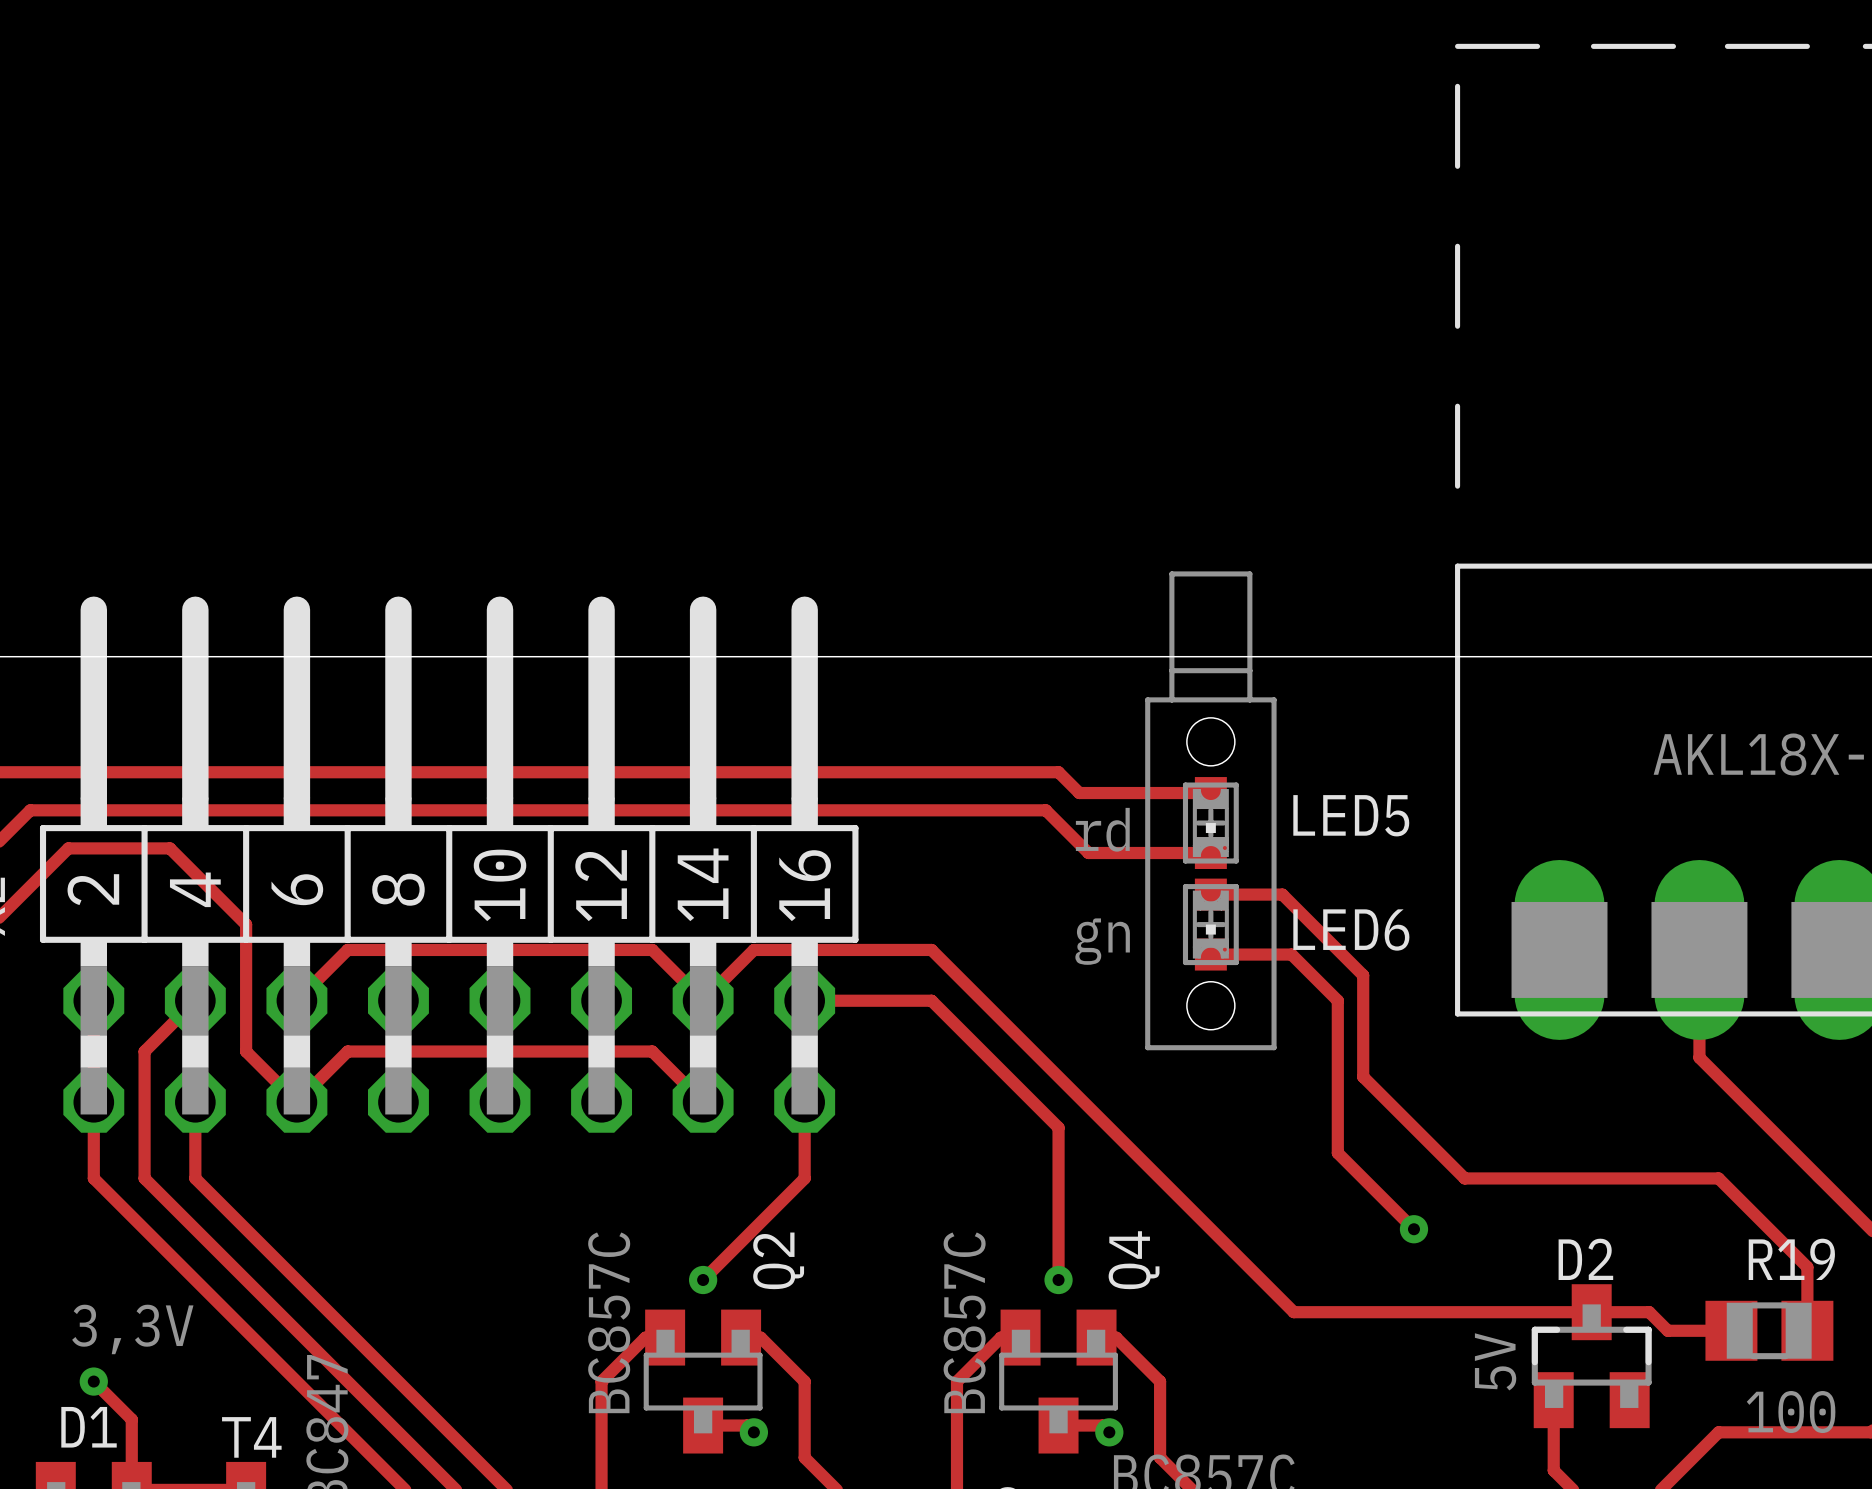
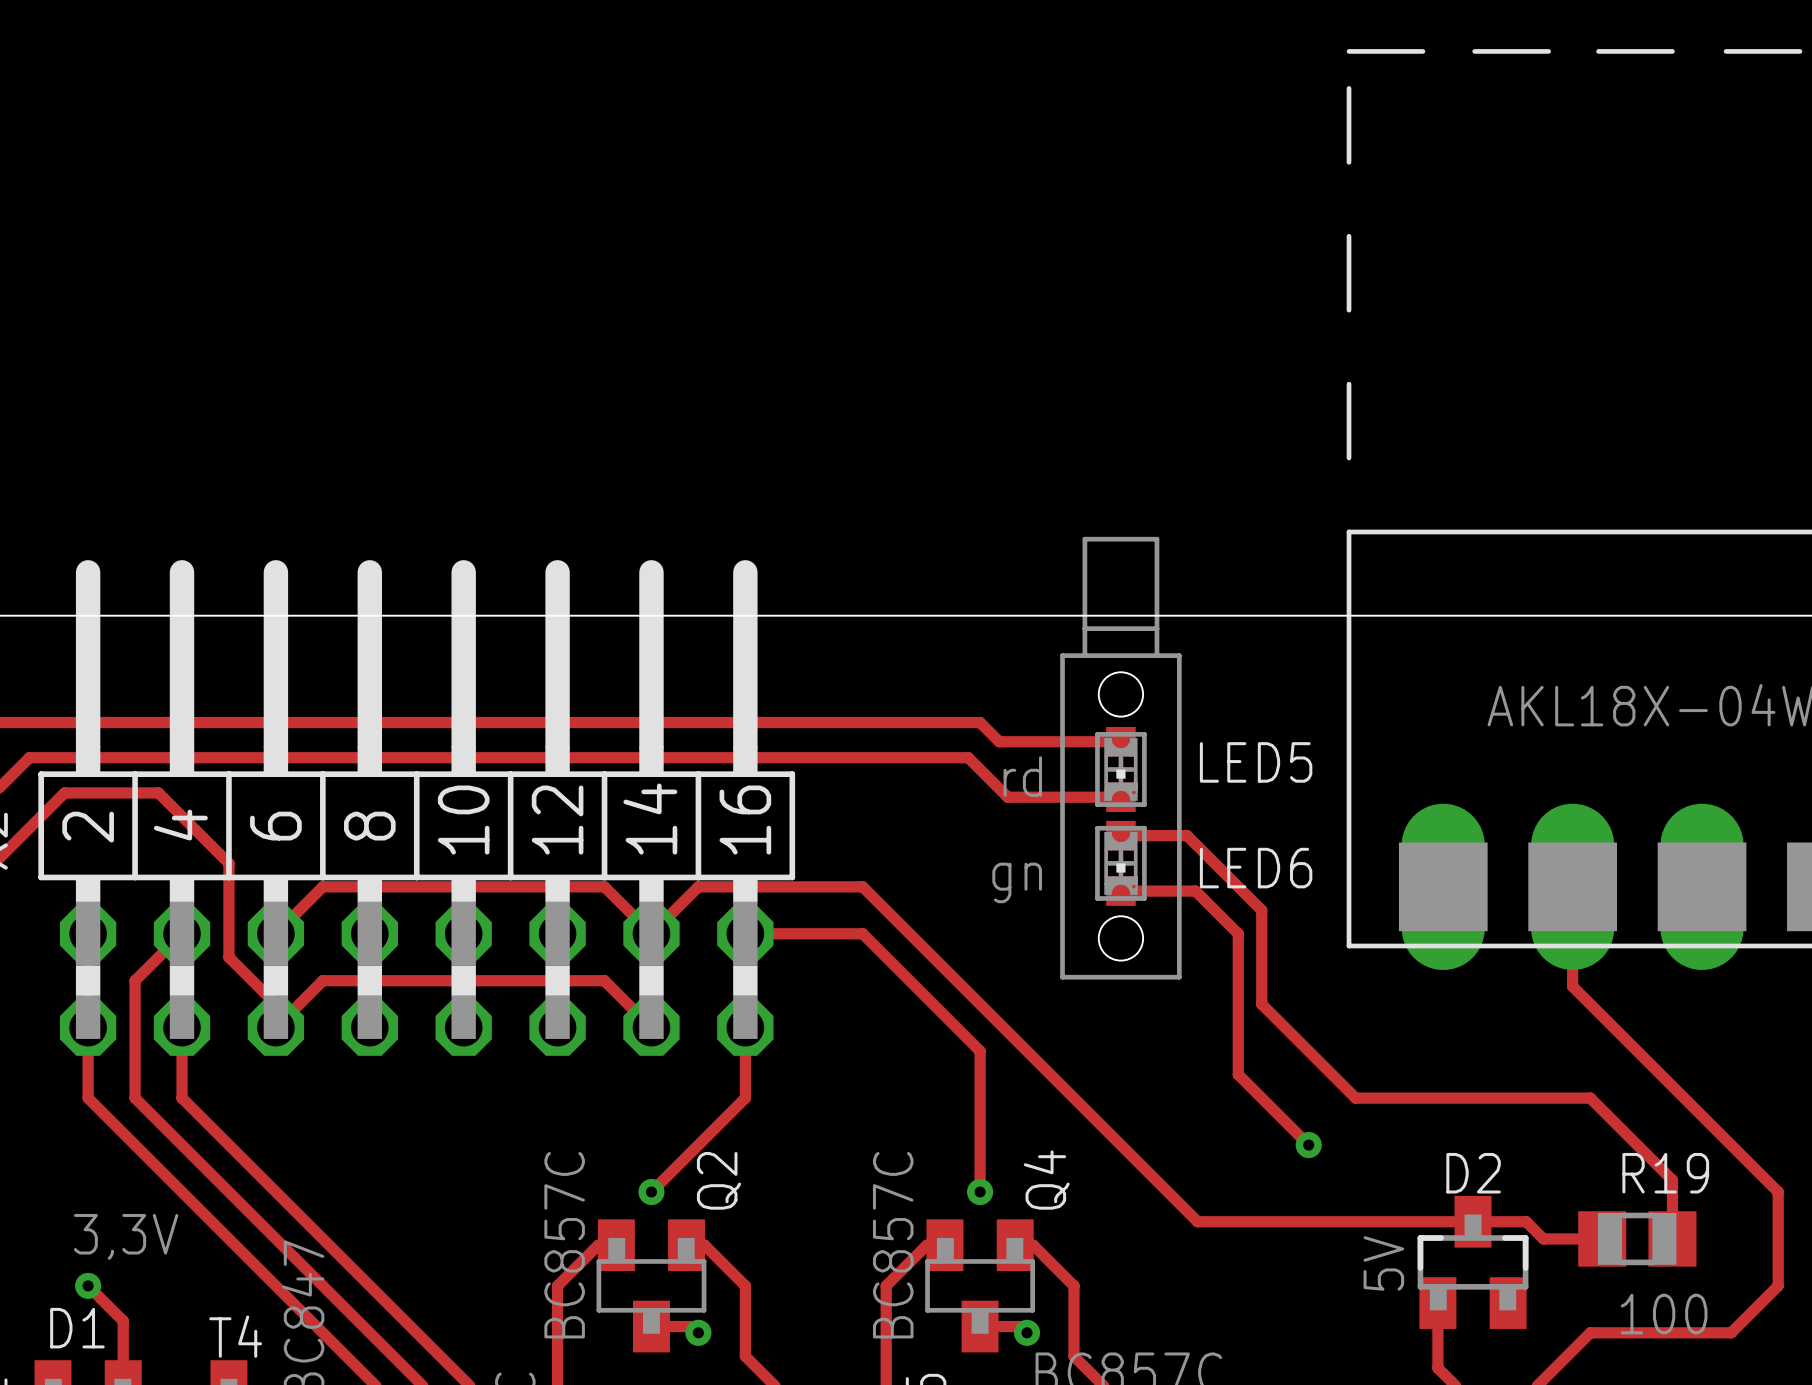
track: (246, 1026) (246, 1051) (296, 1102) -> (228, 957) (275, 1004) (275, 1027)

